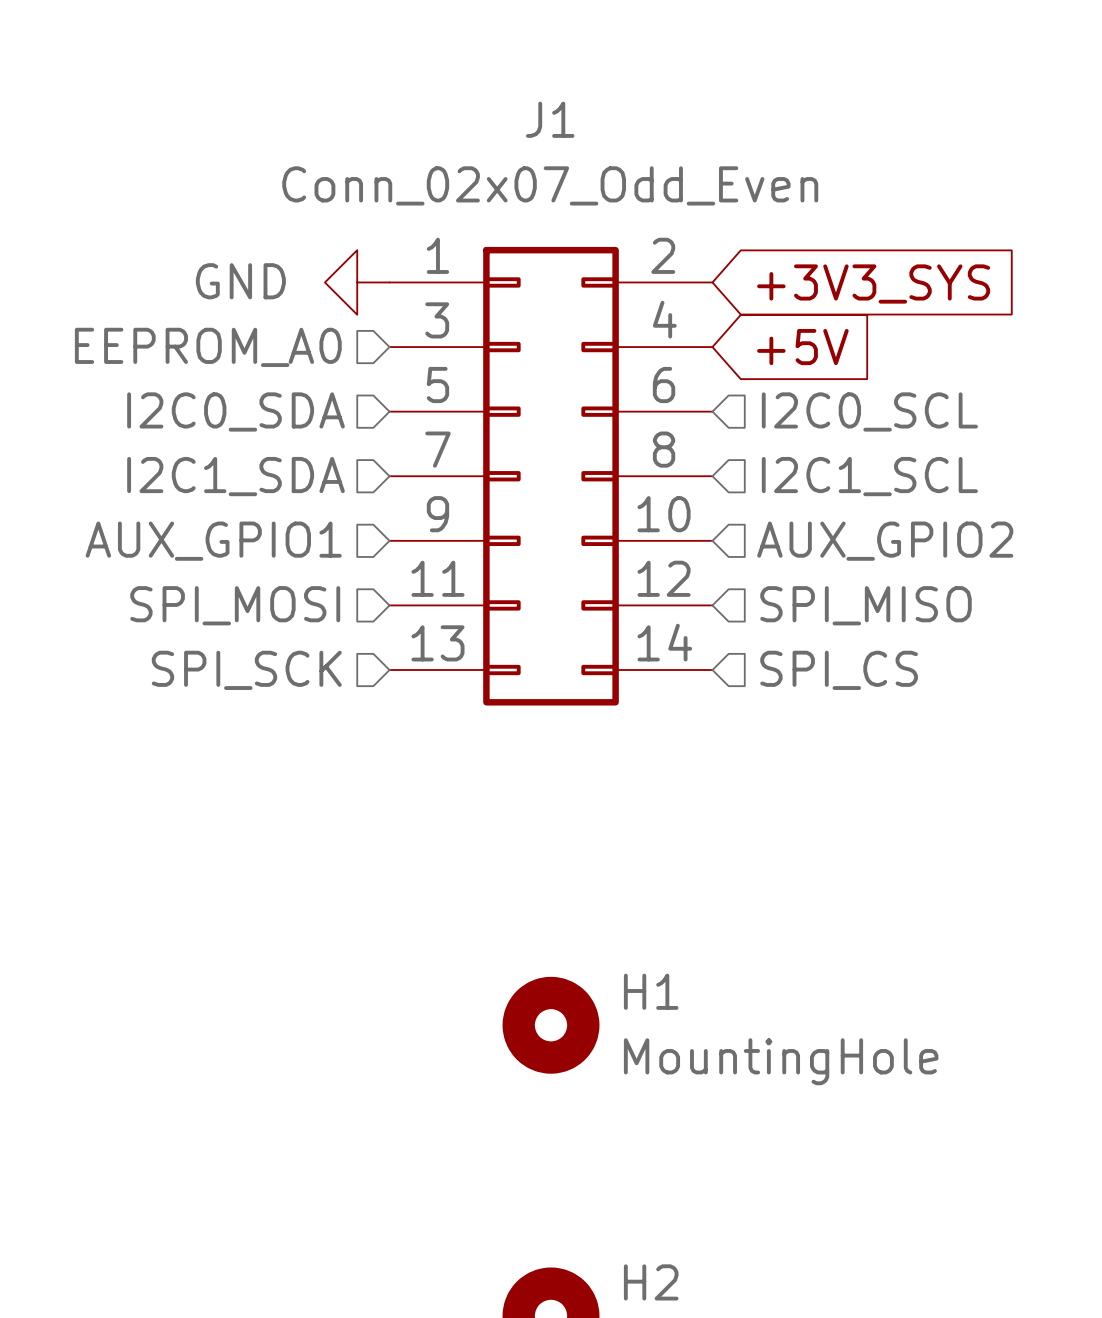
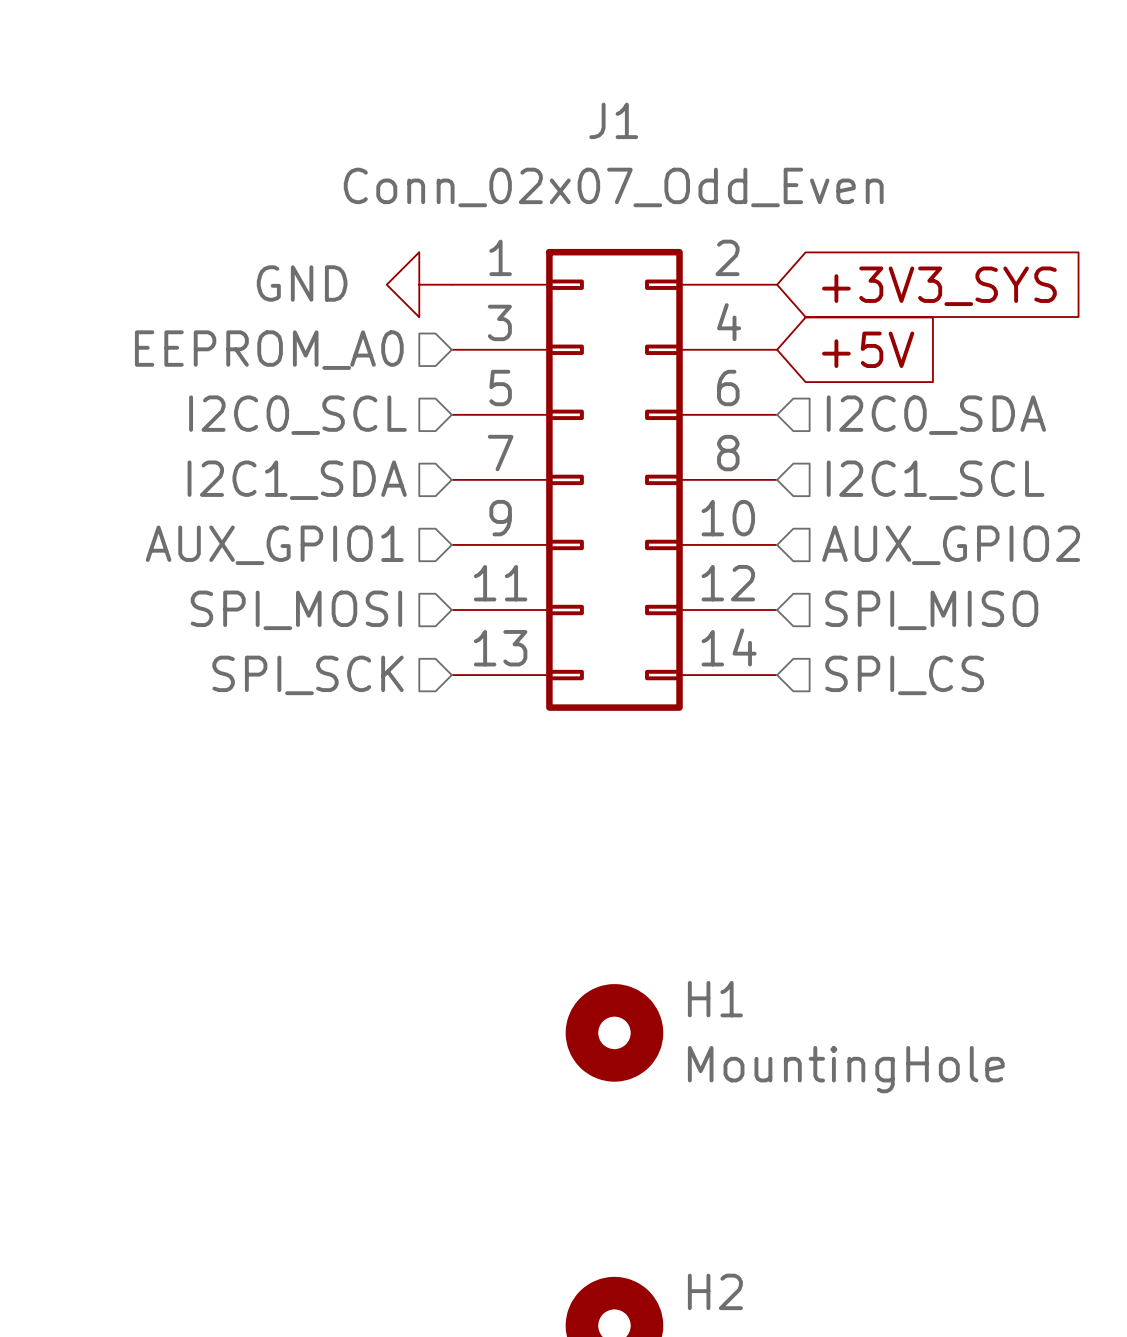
hierarchical label: I2C0_SDA (236, 411) -> I2C0_SCL (297, 415)
hierarchical label: I2C0_SCL (869, 411) -> I2C0_SDA (936, 415)

